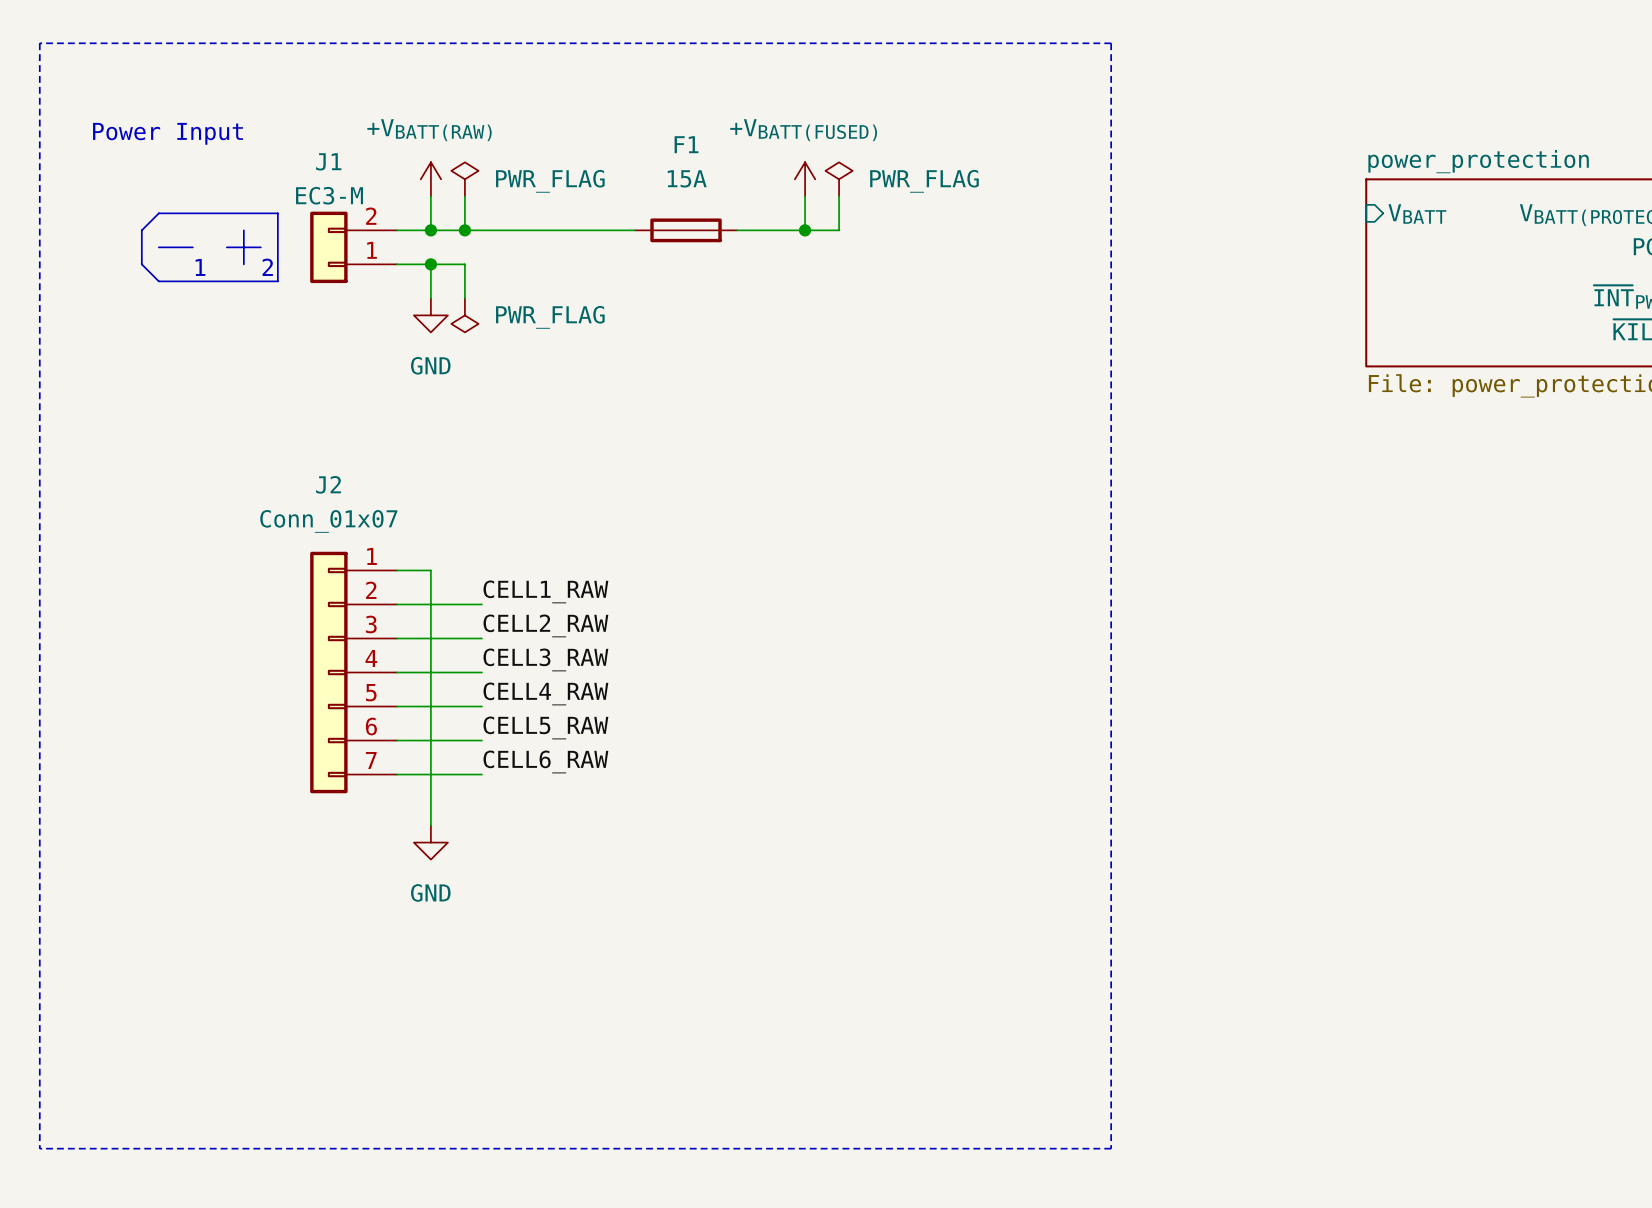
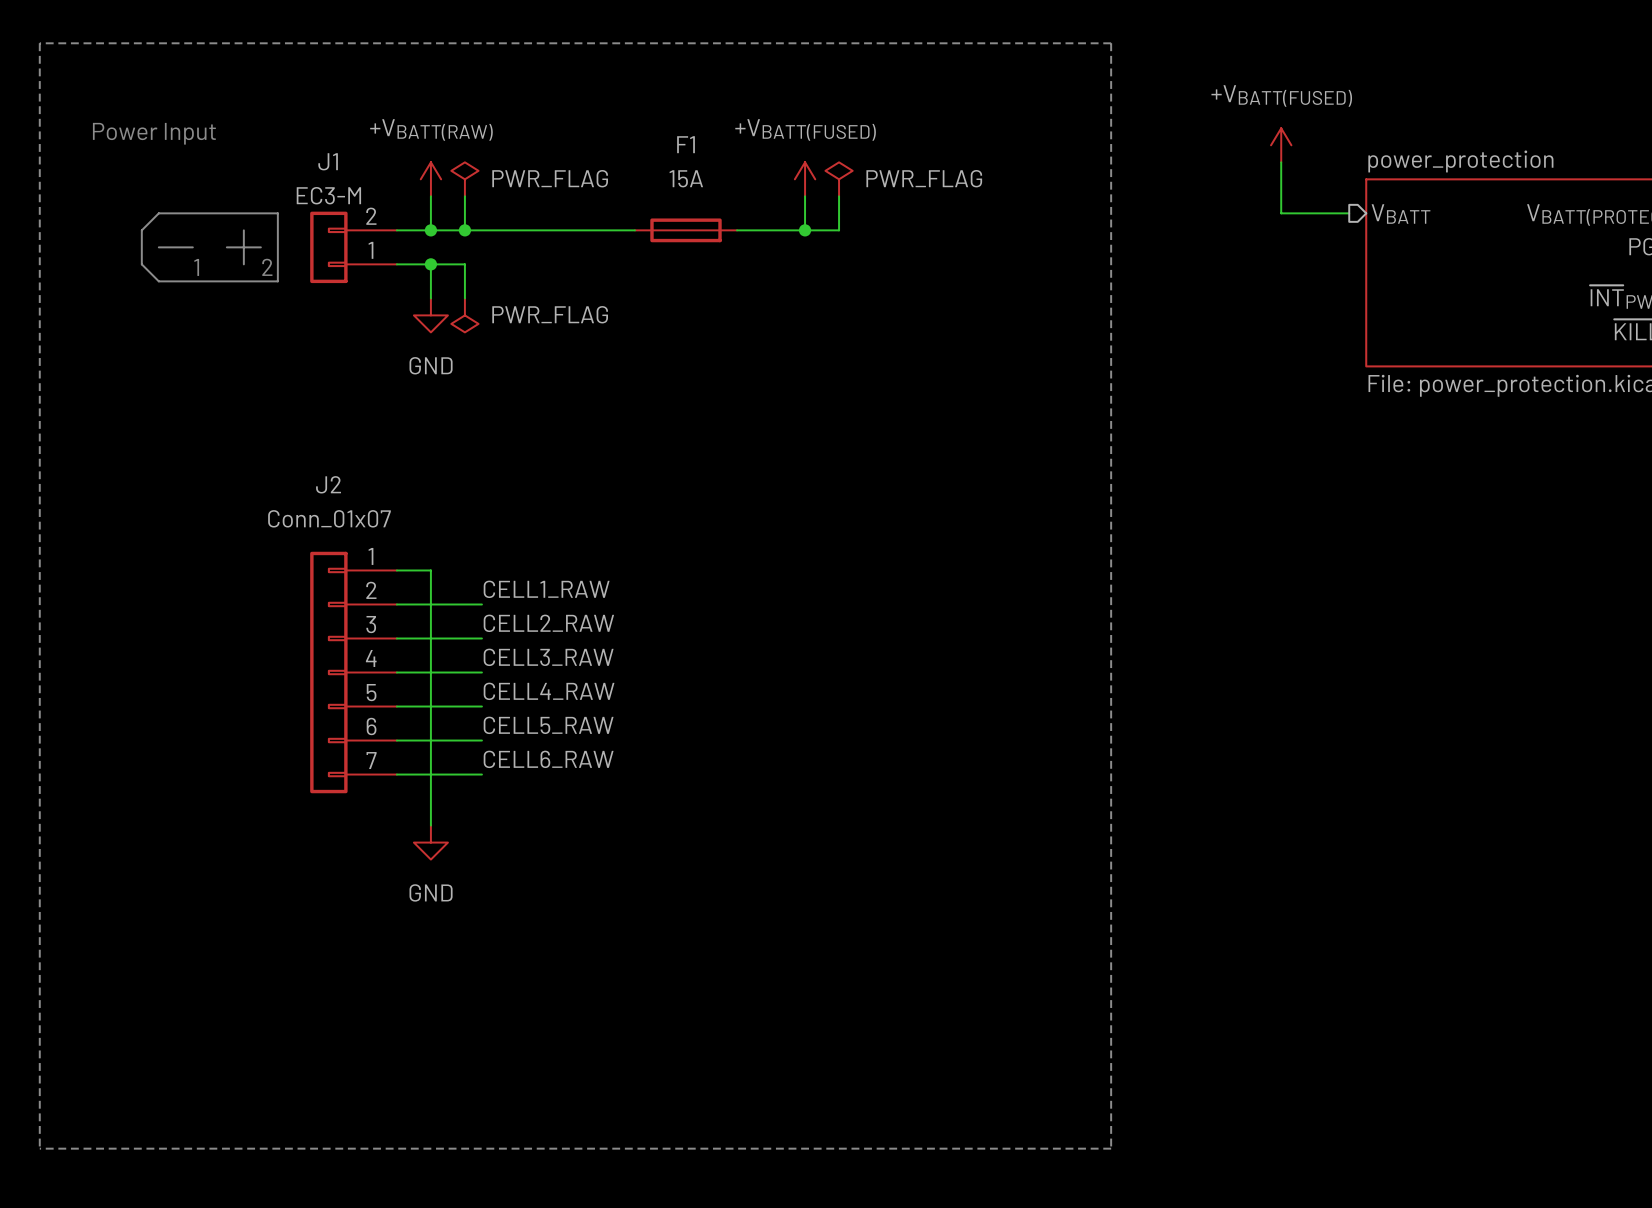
power symbol: none -> +VBATT(FUSED) (1281, 145)
wire: none -> (1281, 162) (1281, 213) (1349, 213)
sheet pin position: VBATT (1417, 213) -> VBATT (1401, 213)

